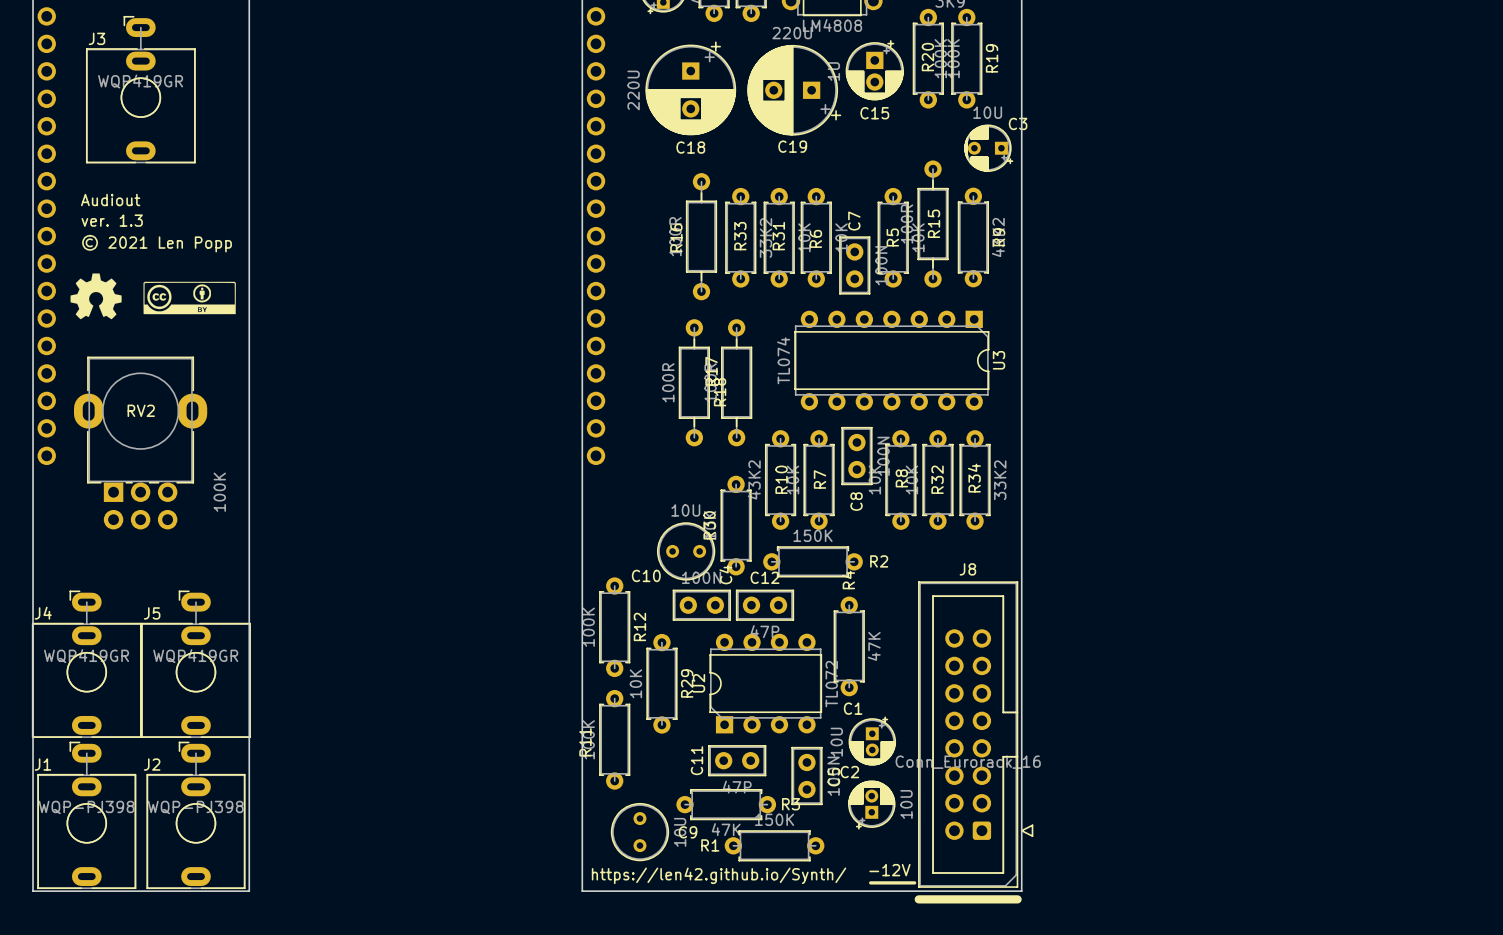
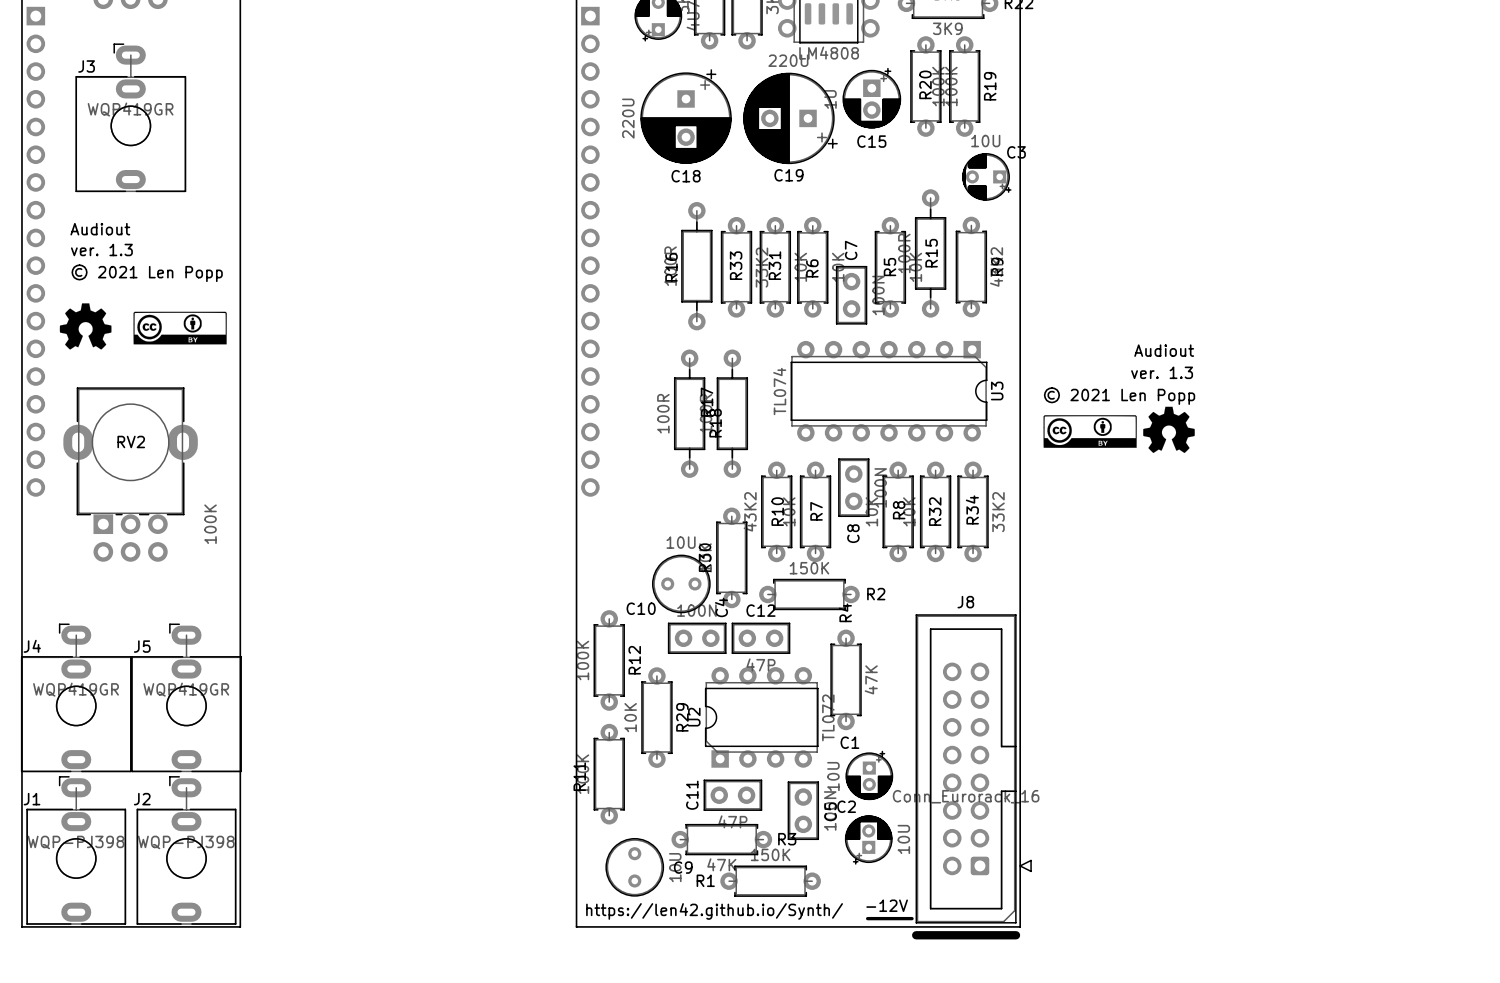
text: none -> Audiout (1164, 350)
text: none -> ver. 1.3 (1162, 372)
text: none -> © 2021 Len Popp (1119, 396)
drawing: none -> [1043, 406, 1195, 454]

